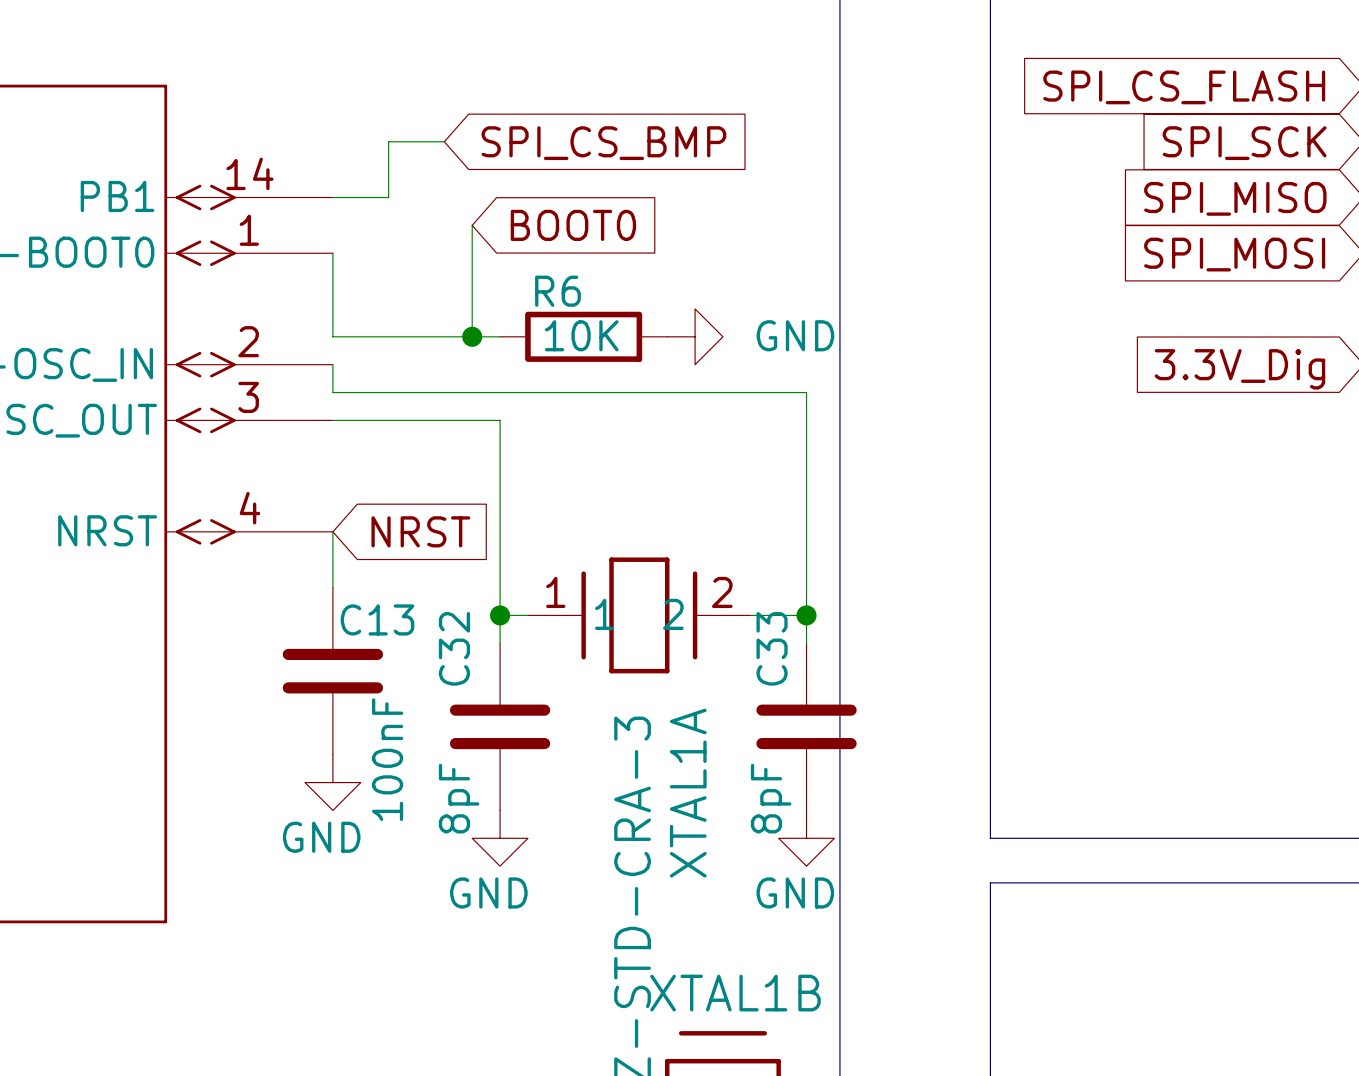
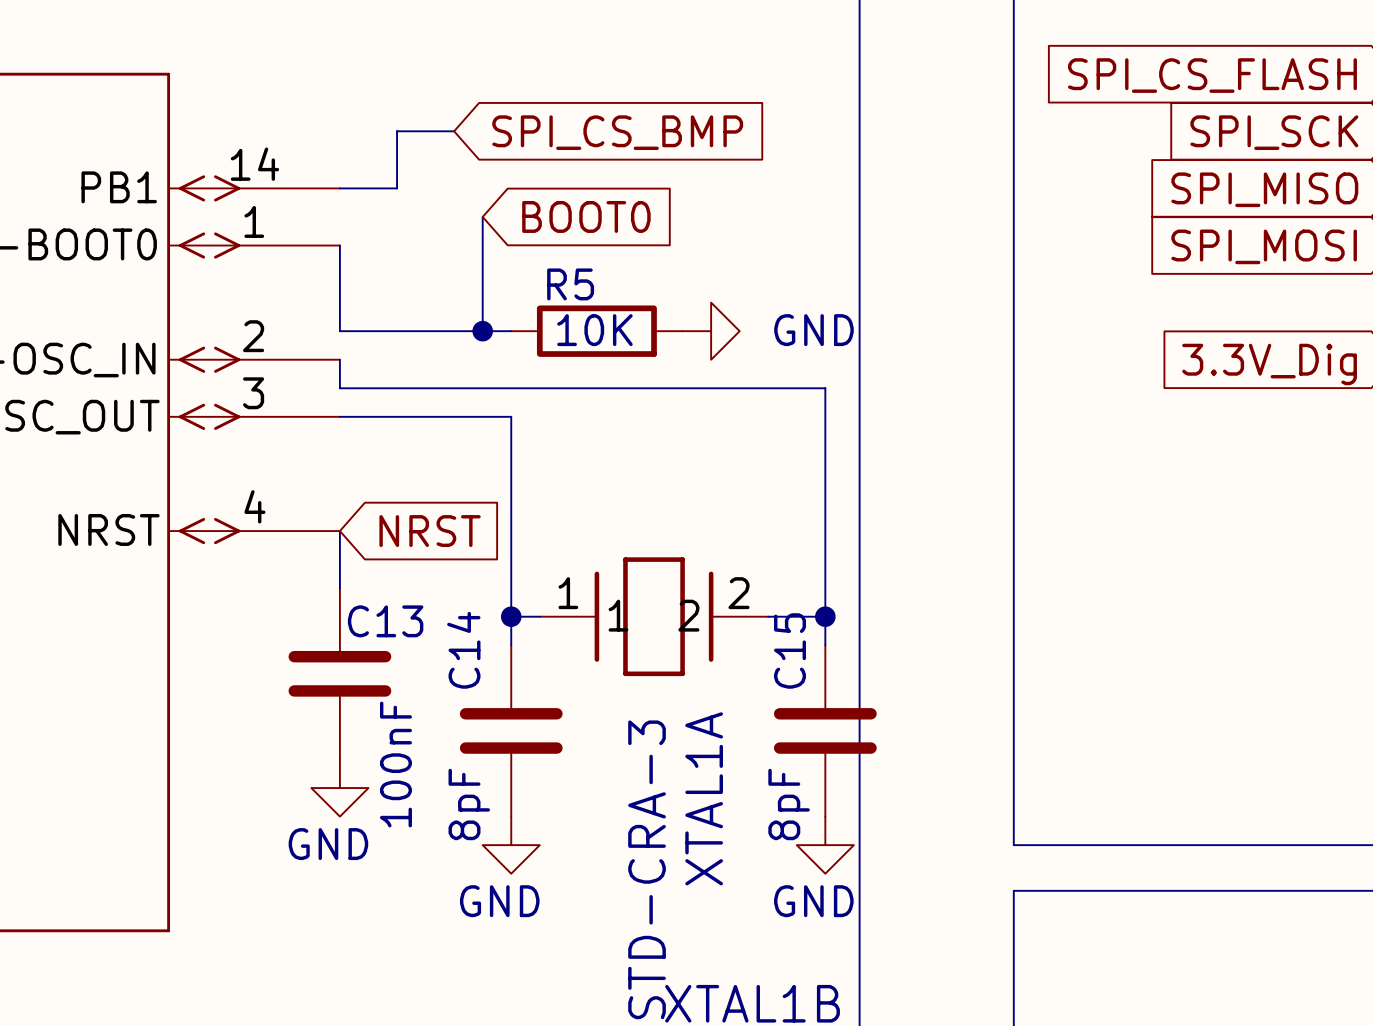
R6 name: R6 (557, 291) -> R5 (570, 284)
C32 name: C32 (454, 648) -> C14 (463, 650)
C33 name: C33 (772, 648) -> C15 (790, 650)

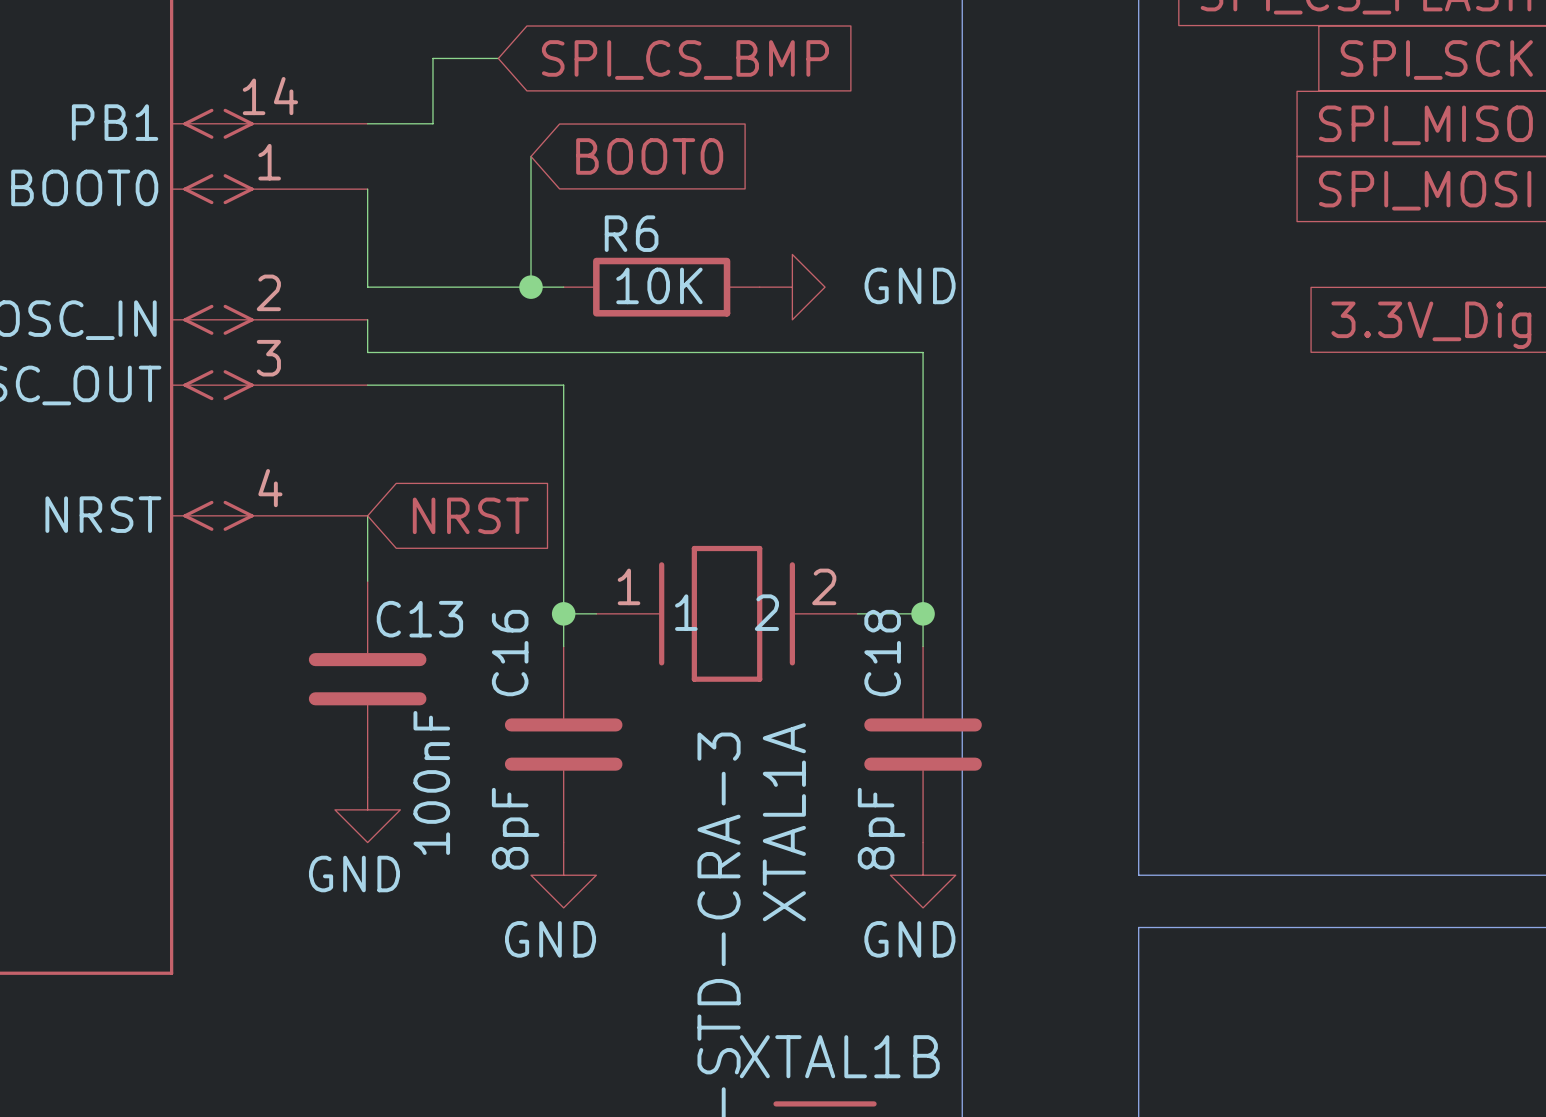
R5 name: R5 (570, 284) -> R6 (631, 233)
C14 name: C14 (463, 650) -> C16 (510, 653)
C15 name: C15 (790, 650) -> C18 (882, 653)

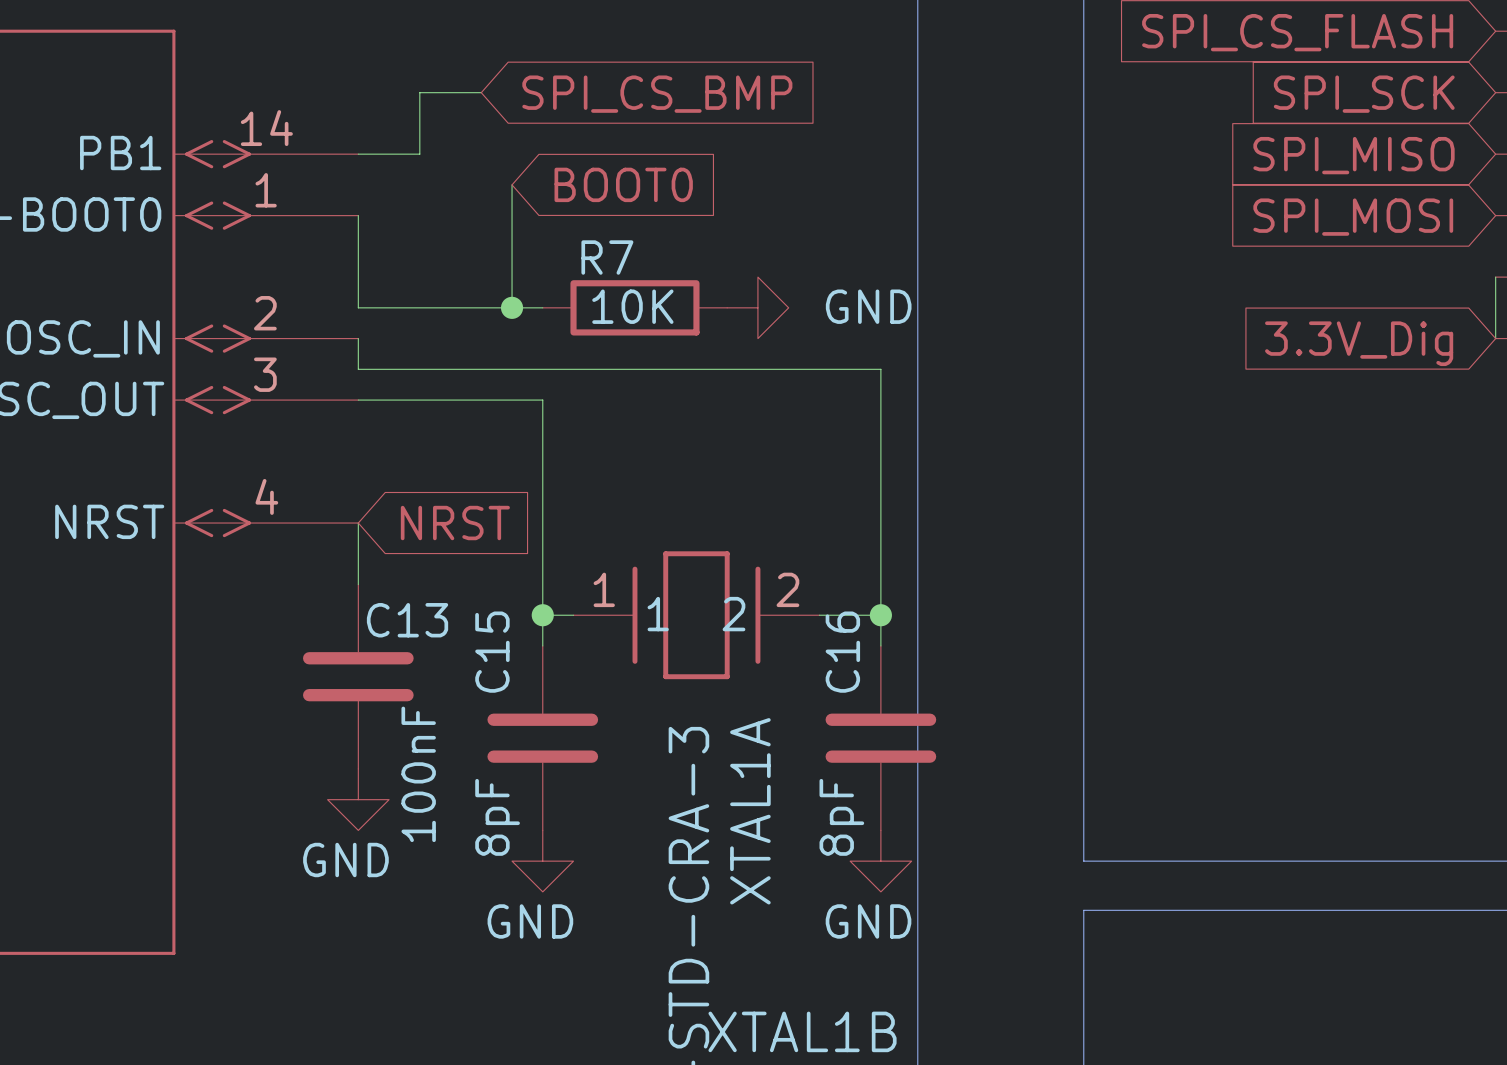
R6 name: R6 (631, 233) -> R7 (607, 257)
C16 name: C16 (510, 653) -> C15 (492, 652)
C18 name: C18 (882, 653) -> C16 (842, 652)

